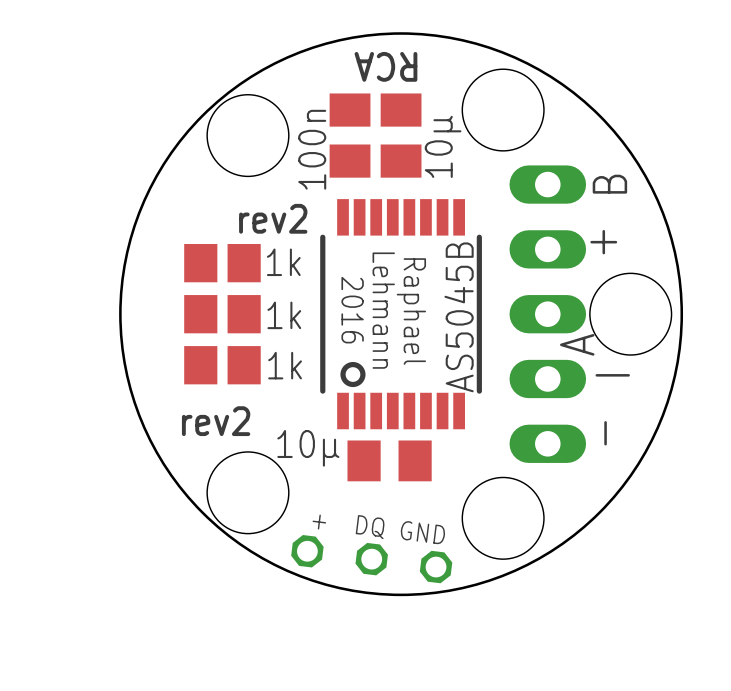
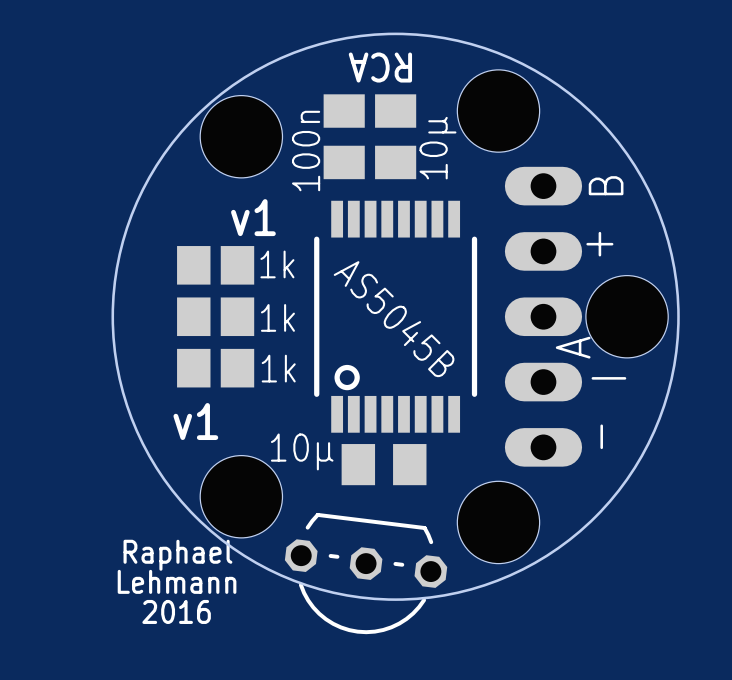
text: rev2 (273, 218) -> v1 (253, 217)
text rotation: 0° (352, 310) -> 90° counterclockwise (176, 611)
text position: 2016 (352, 310) -> 2016 (176, 611)
text rotation: 0° (383, 310) -> 90° counterclockwise (177, 581)
text position: Lehmann (383, 310) -> Lehmann (177, 581)
text rotation: 0° (411, 311) -> 90° counterclockwise (177, 555)
text position: Raphael (411, 311) -> Raphael (177, 555)
part value rotation: 0° (459, 317) -> 135° clockwise (394, 319)
text: rev2 (216, 421) -> v1 (195, 421)
text: + DQ GND (378, 529) -> none
part side: bottom (371, 559) -> top (366, 573)

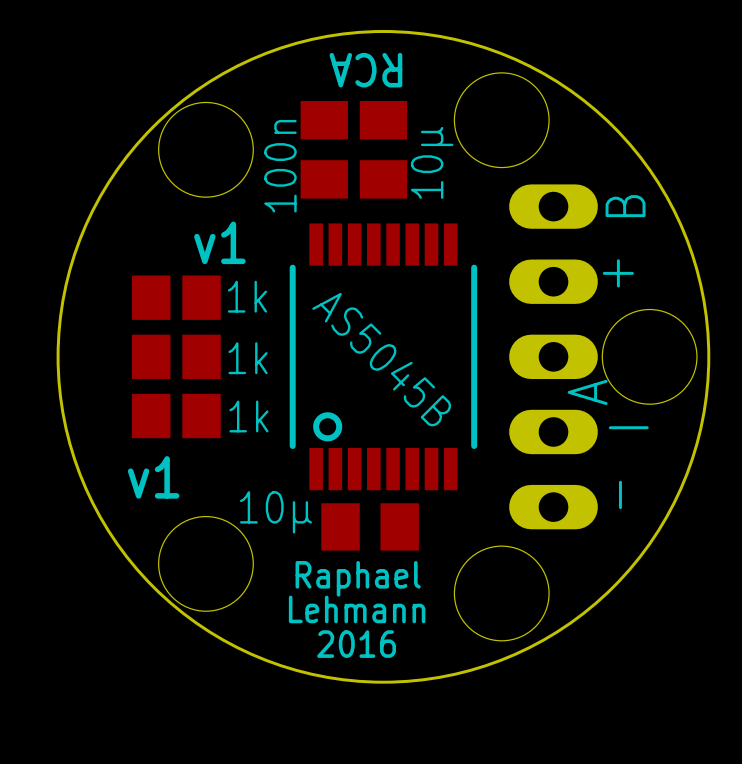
text position: Raphael (177, 555) -> Raphael (358, 578)
part: (366, 573) -> none
text position: Lehmann (177, 581) -> Lehmann (357, 609)
text position: 2016 (176, 611) -> 2016 (356, 644)

